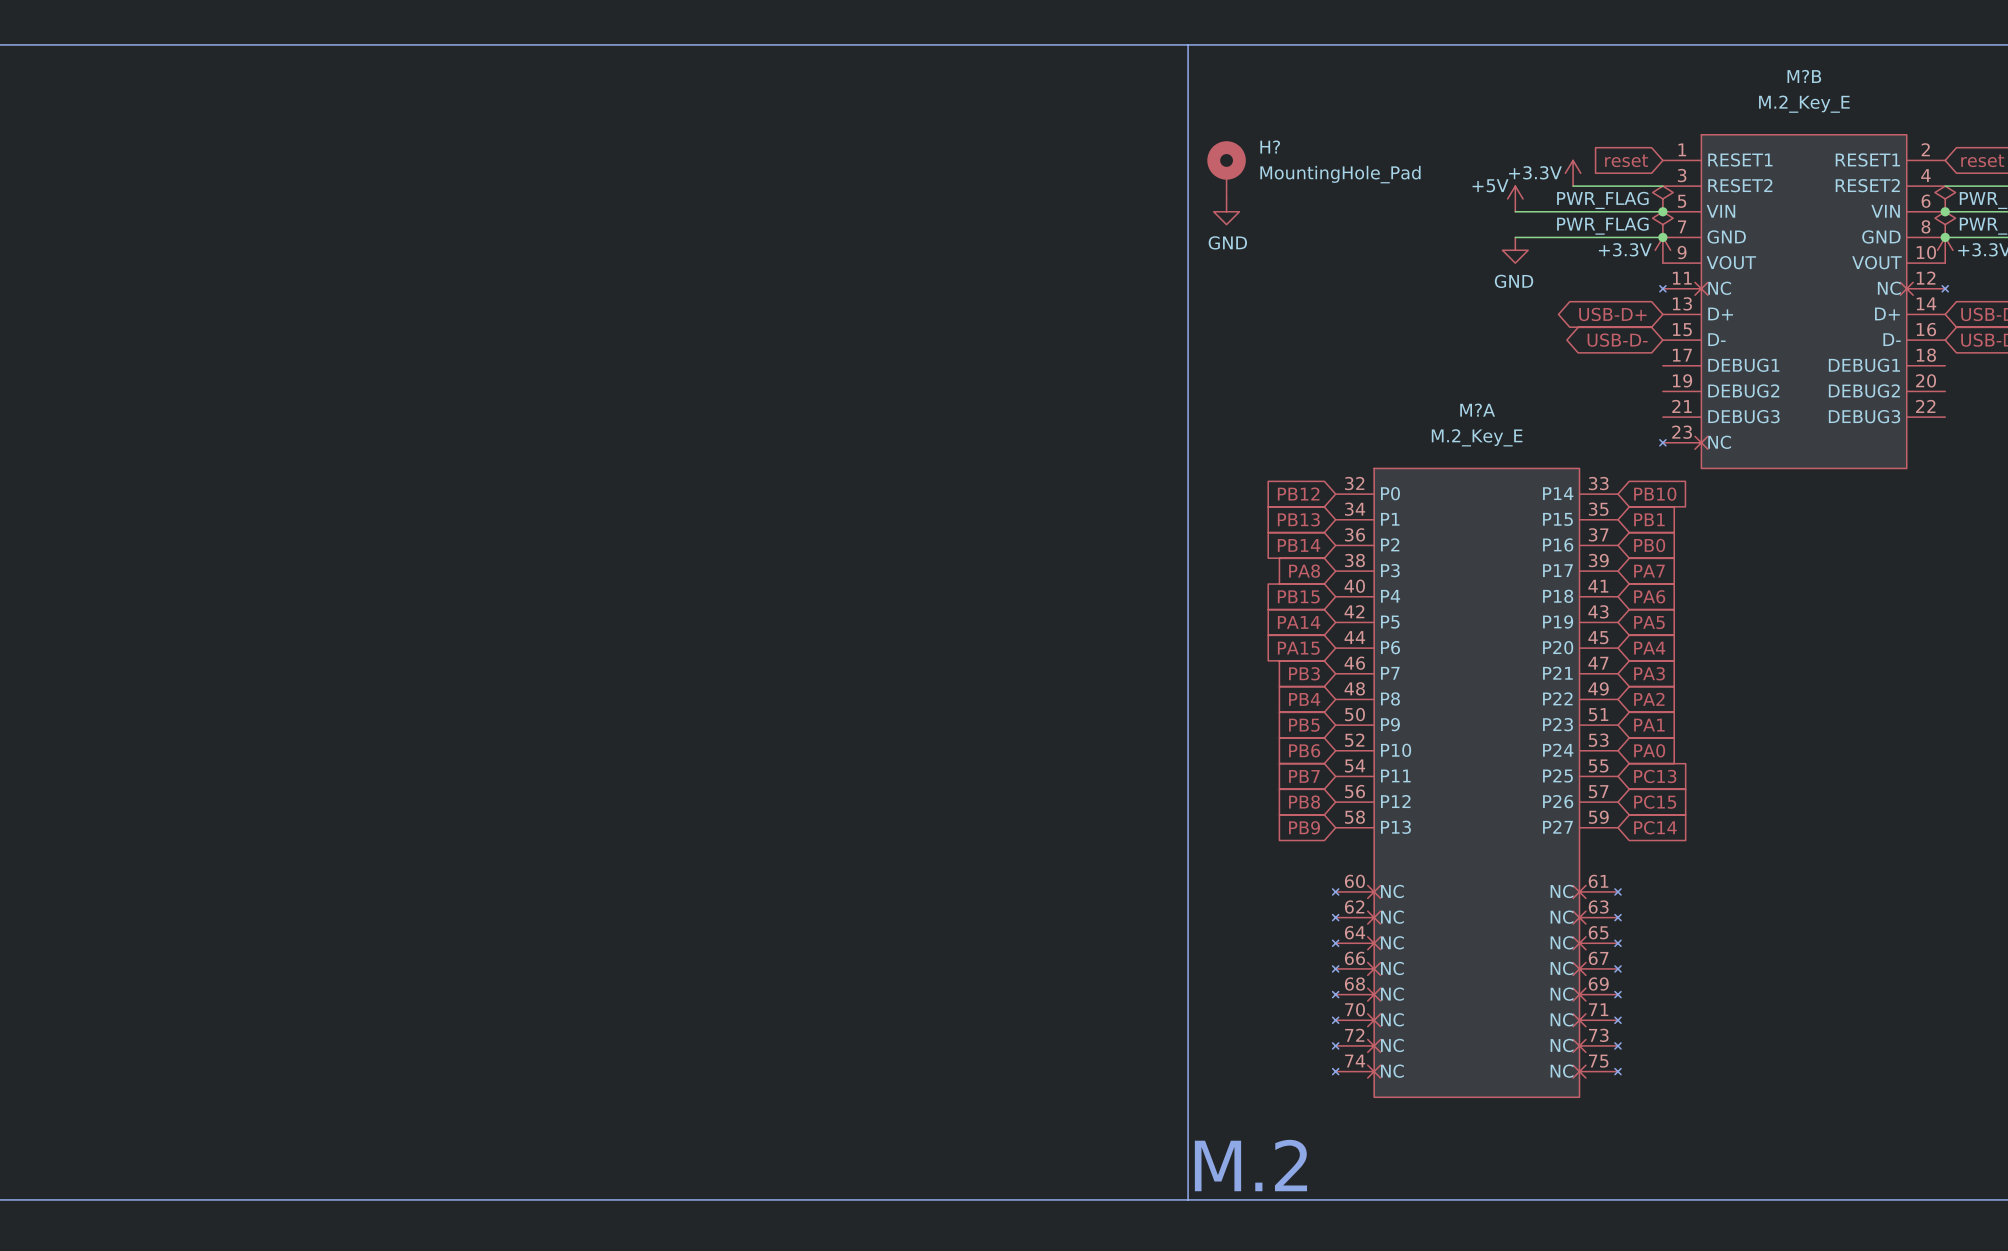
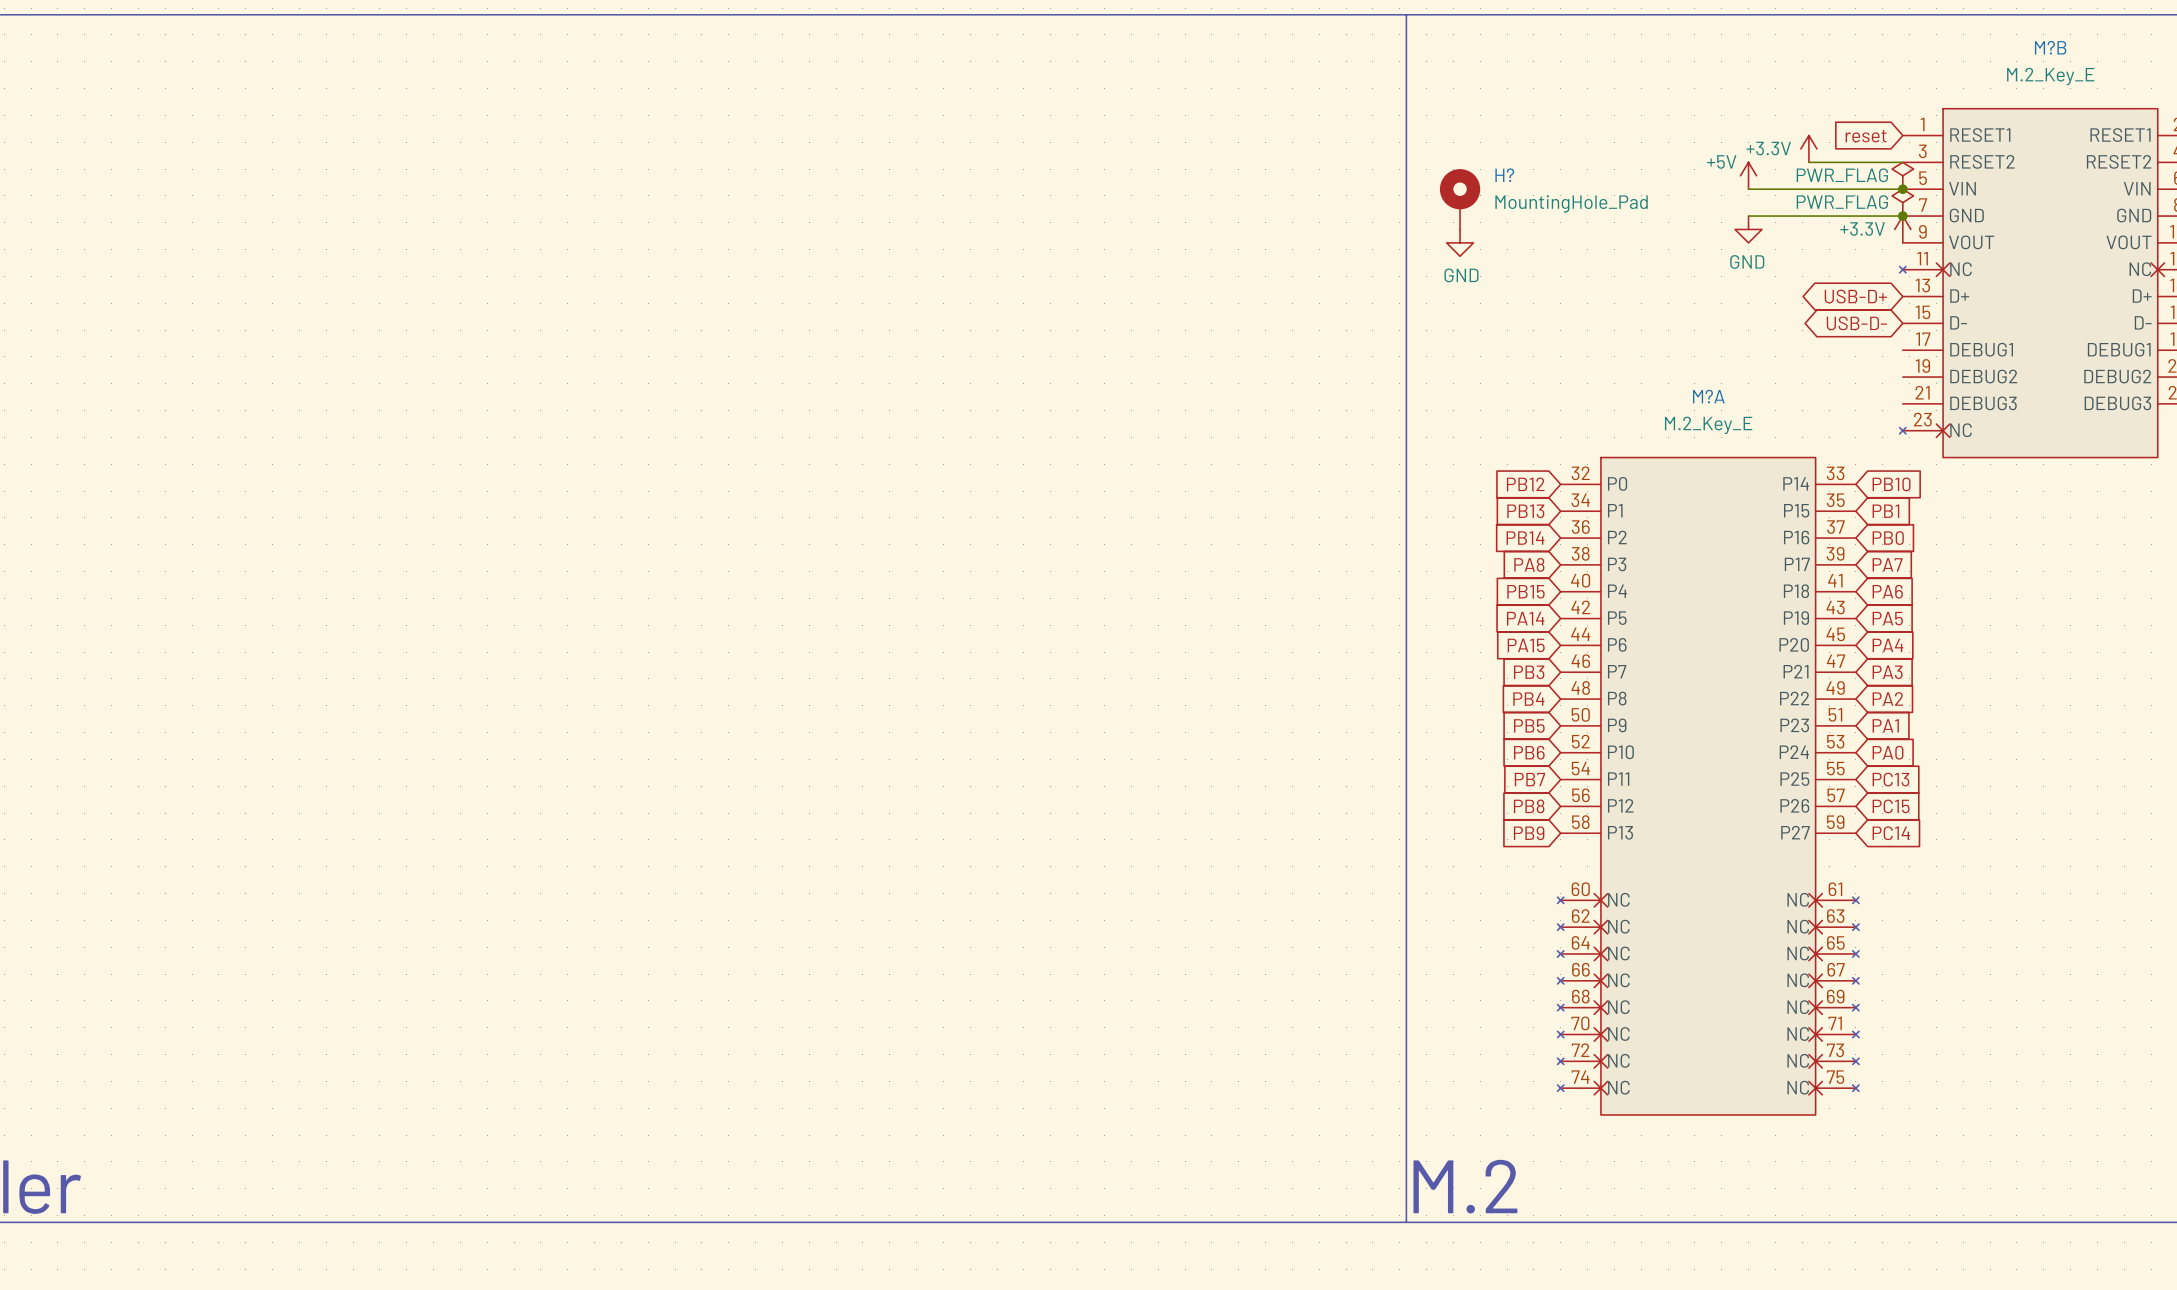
H? position: (1226, 170) -> (1460, 199)
power symbol position: GND (1226, 211) -> GND (1460, 242)

